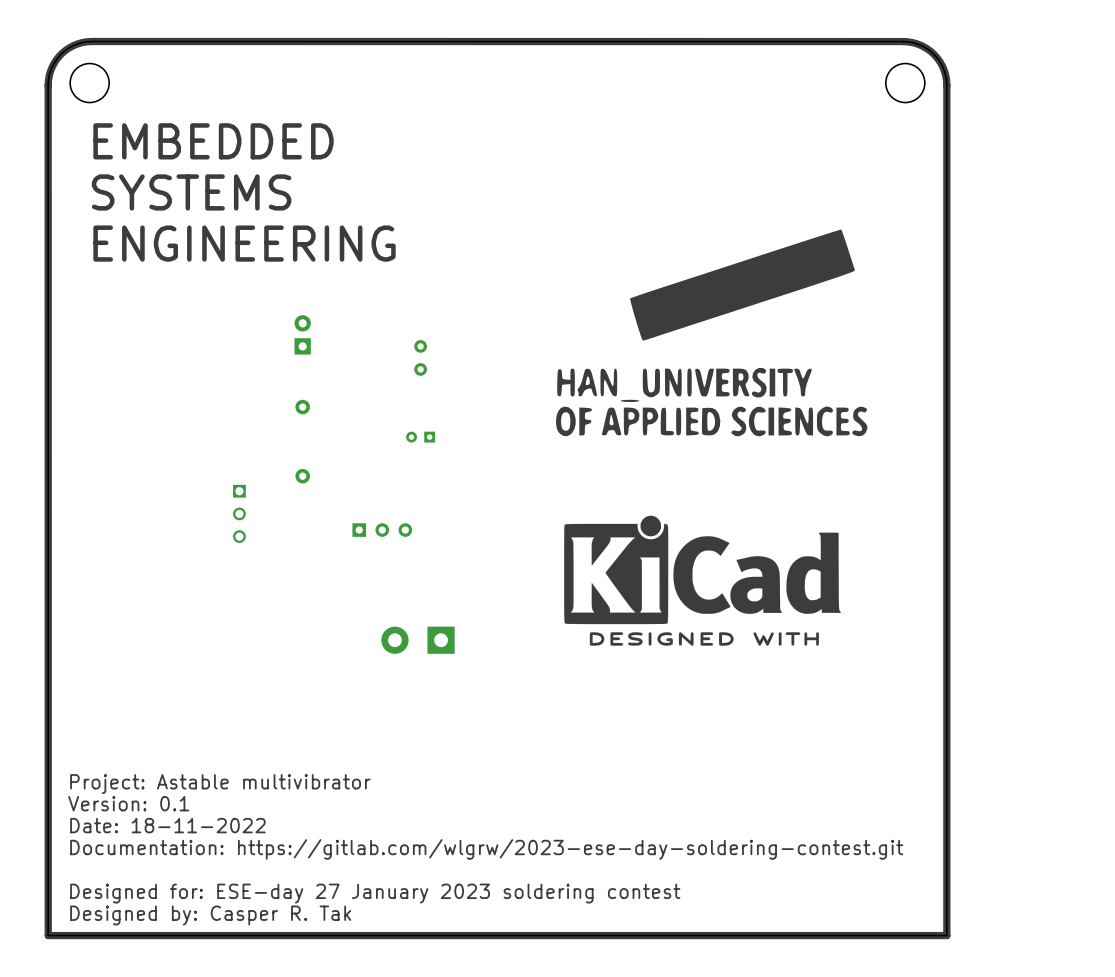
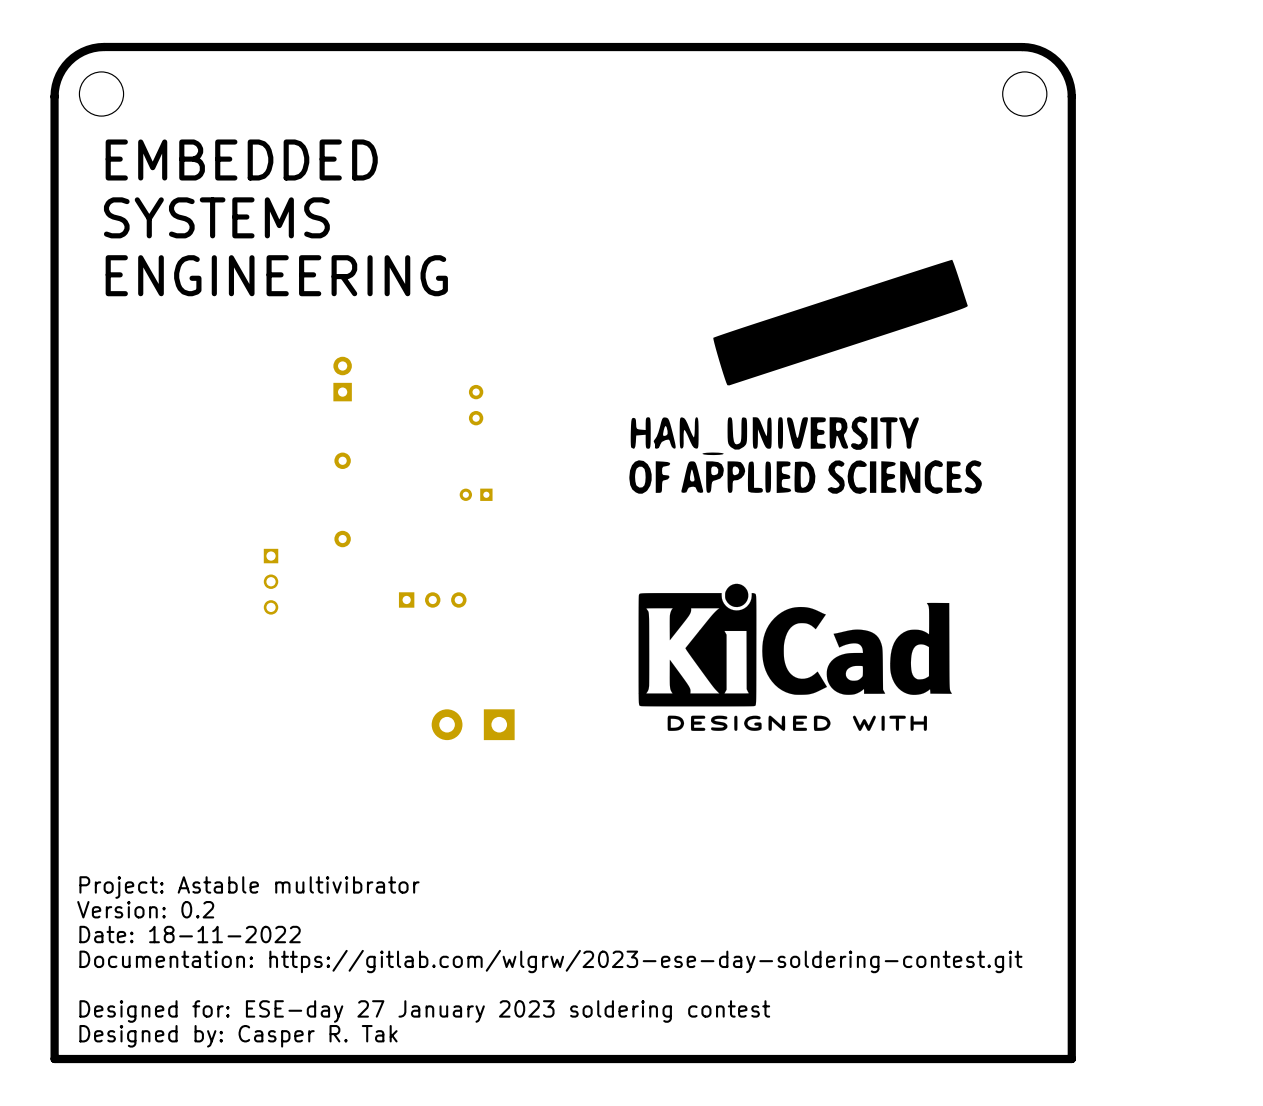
text: Version: 0.1 (128, 803) -> Version: 0.2 (145, 909)

